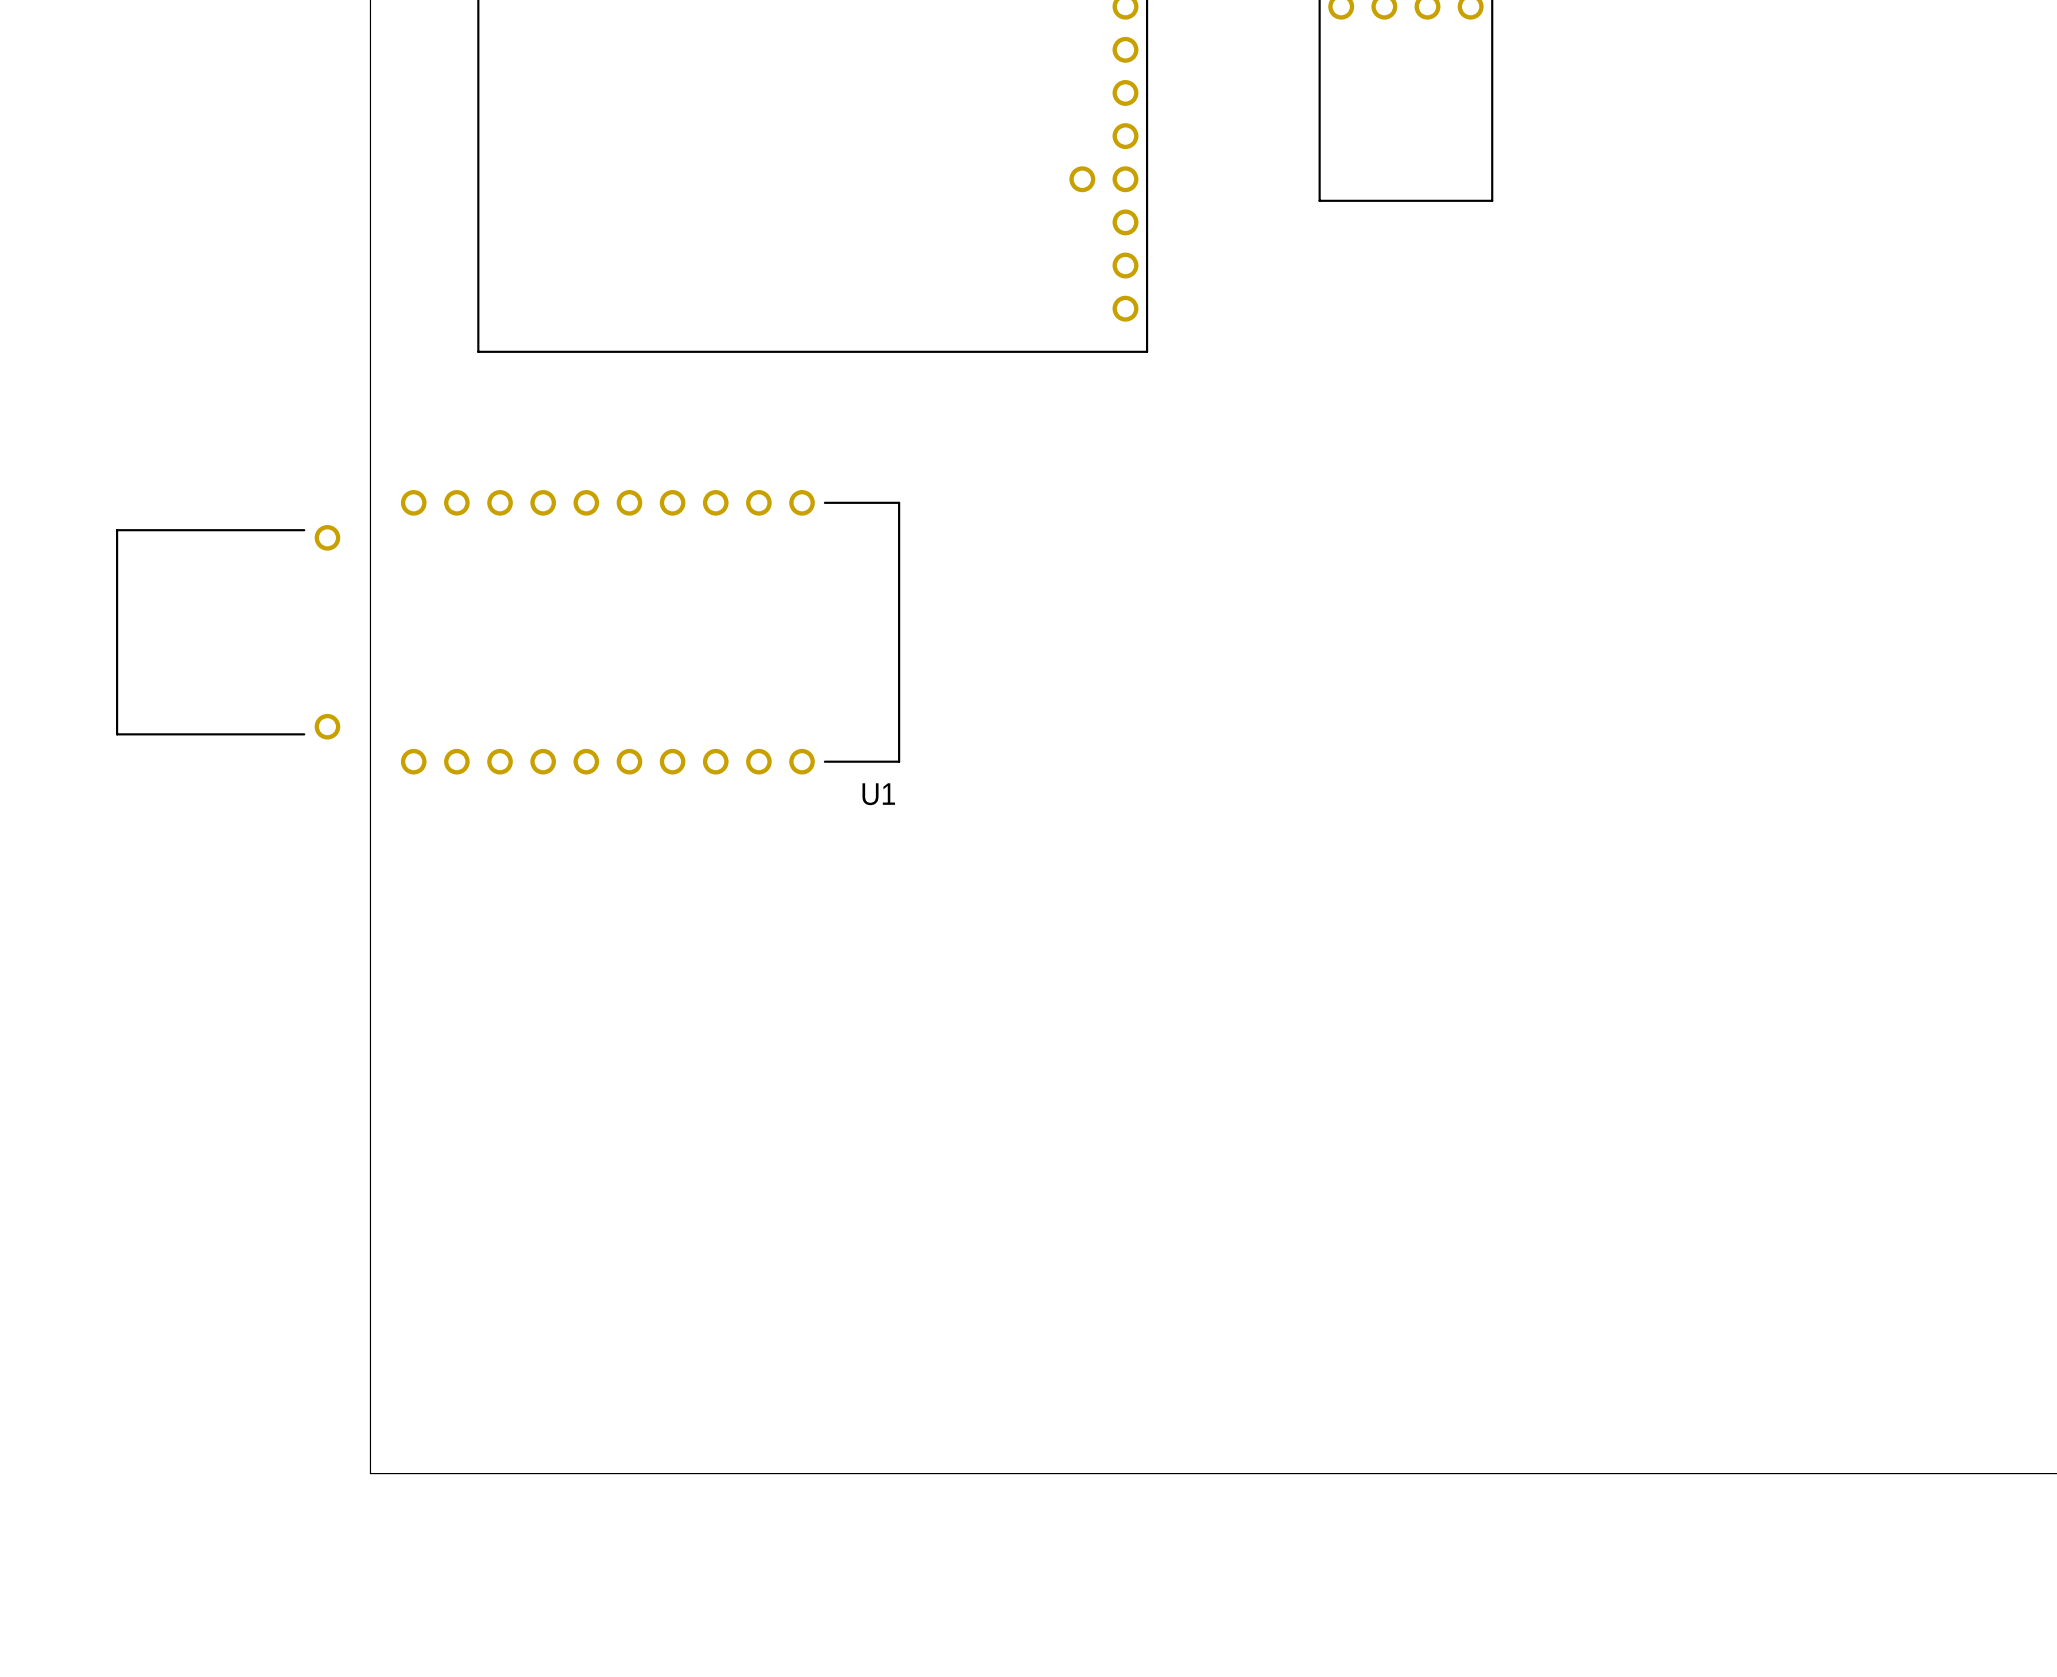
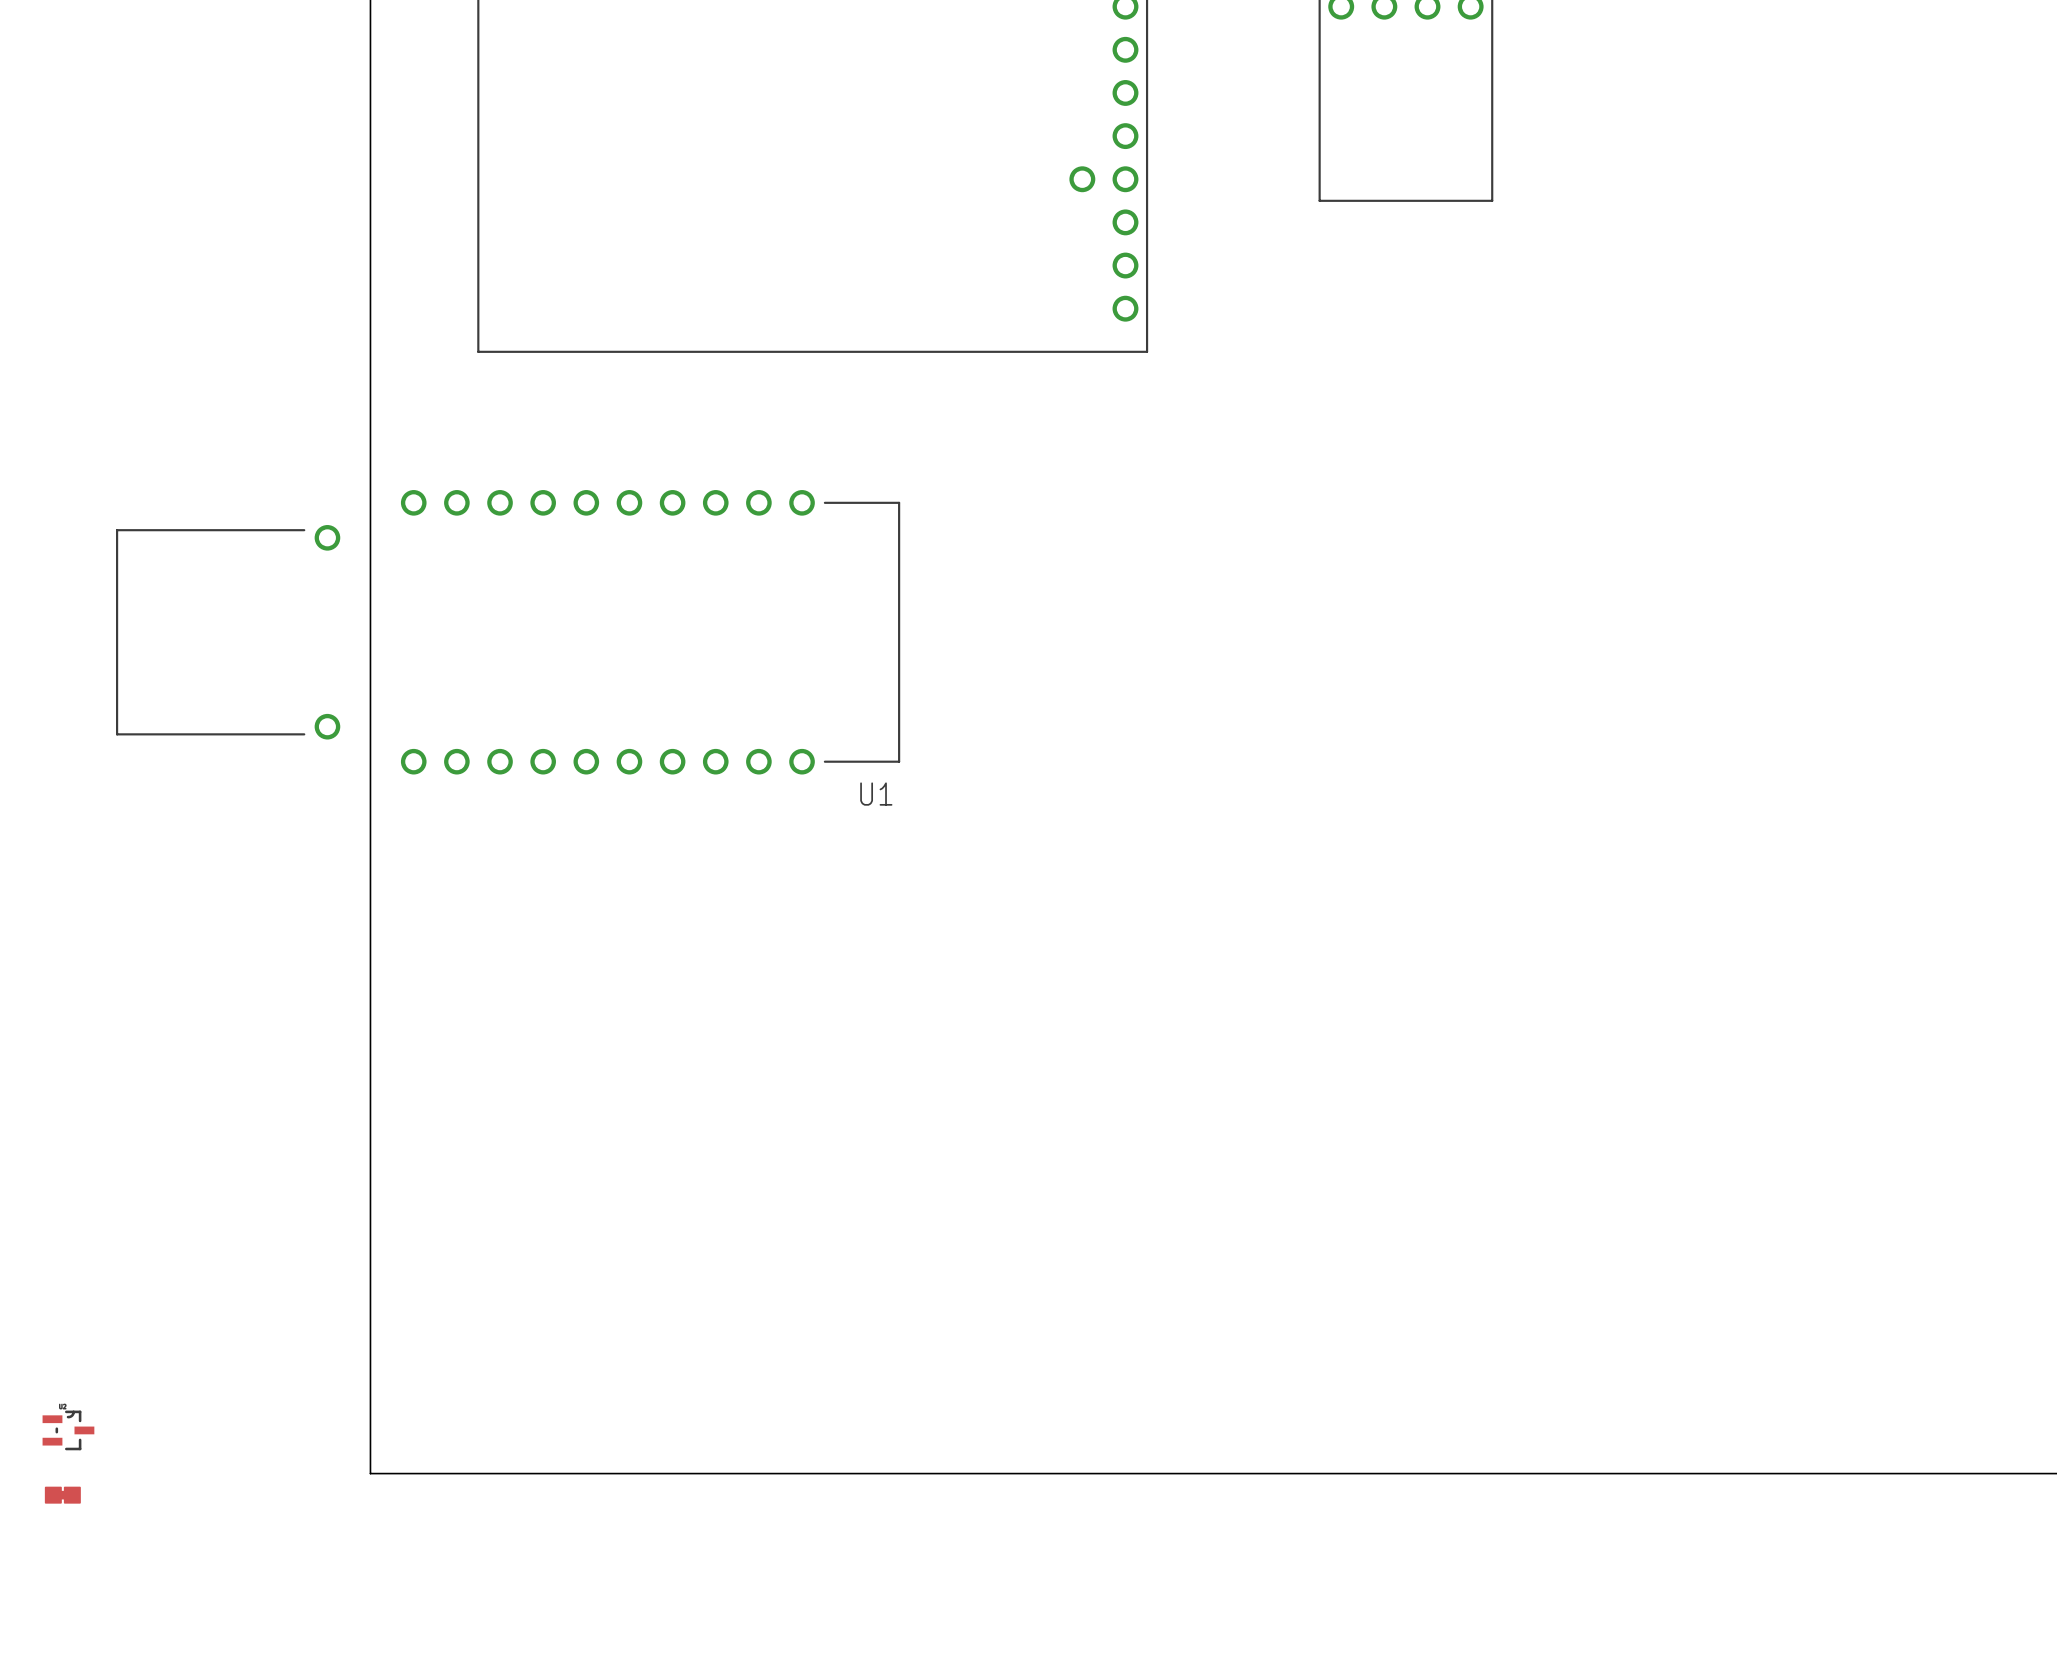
part: none -> (68, 1430)
part: none -> (62, 1495)

